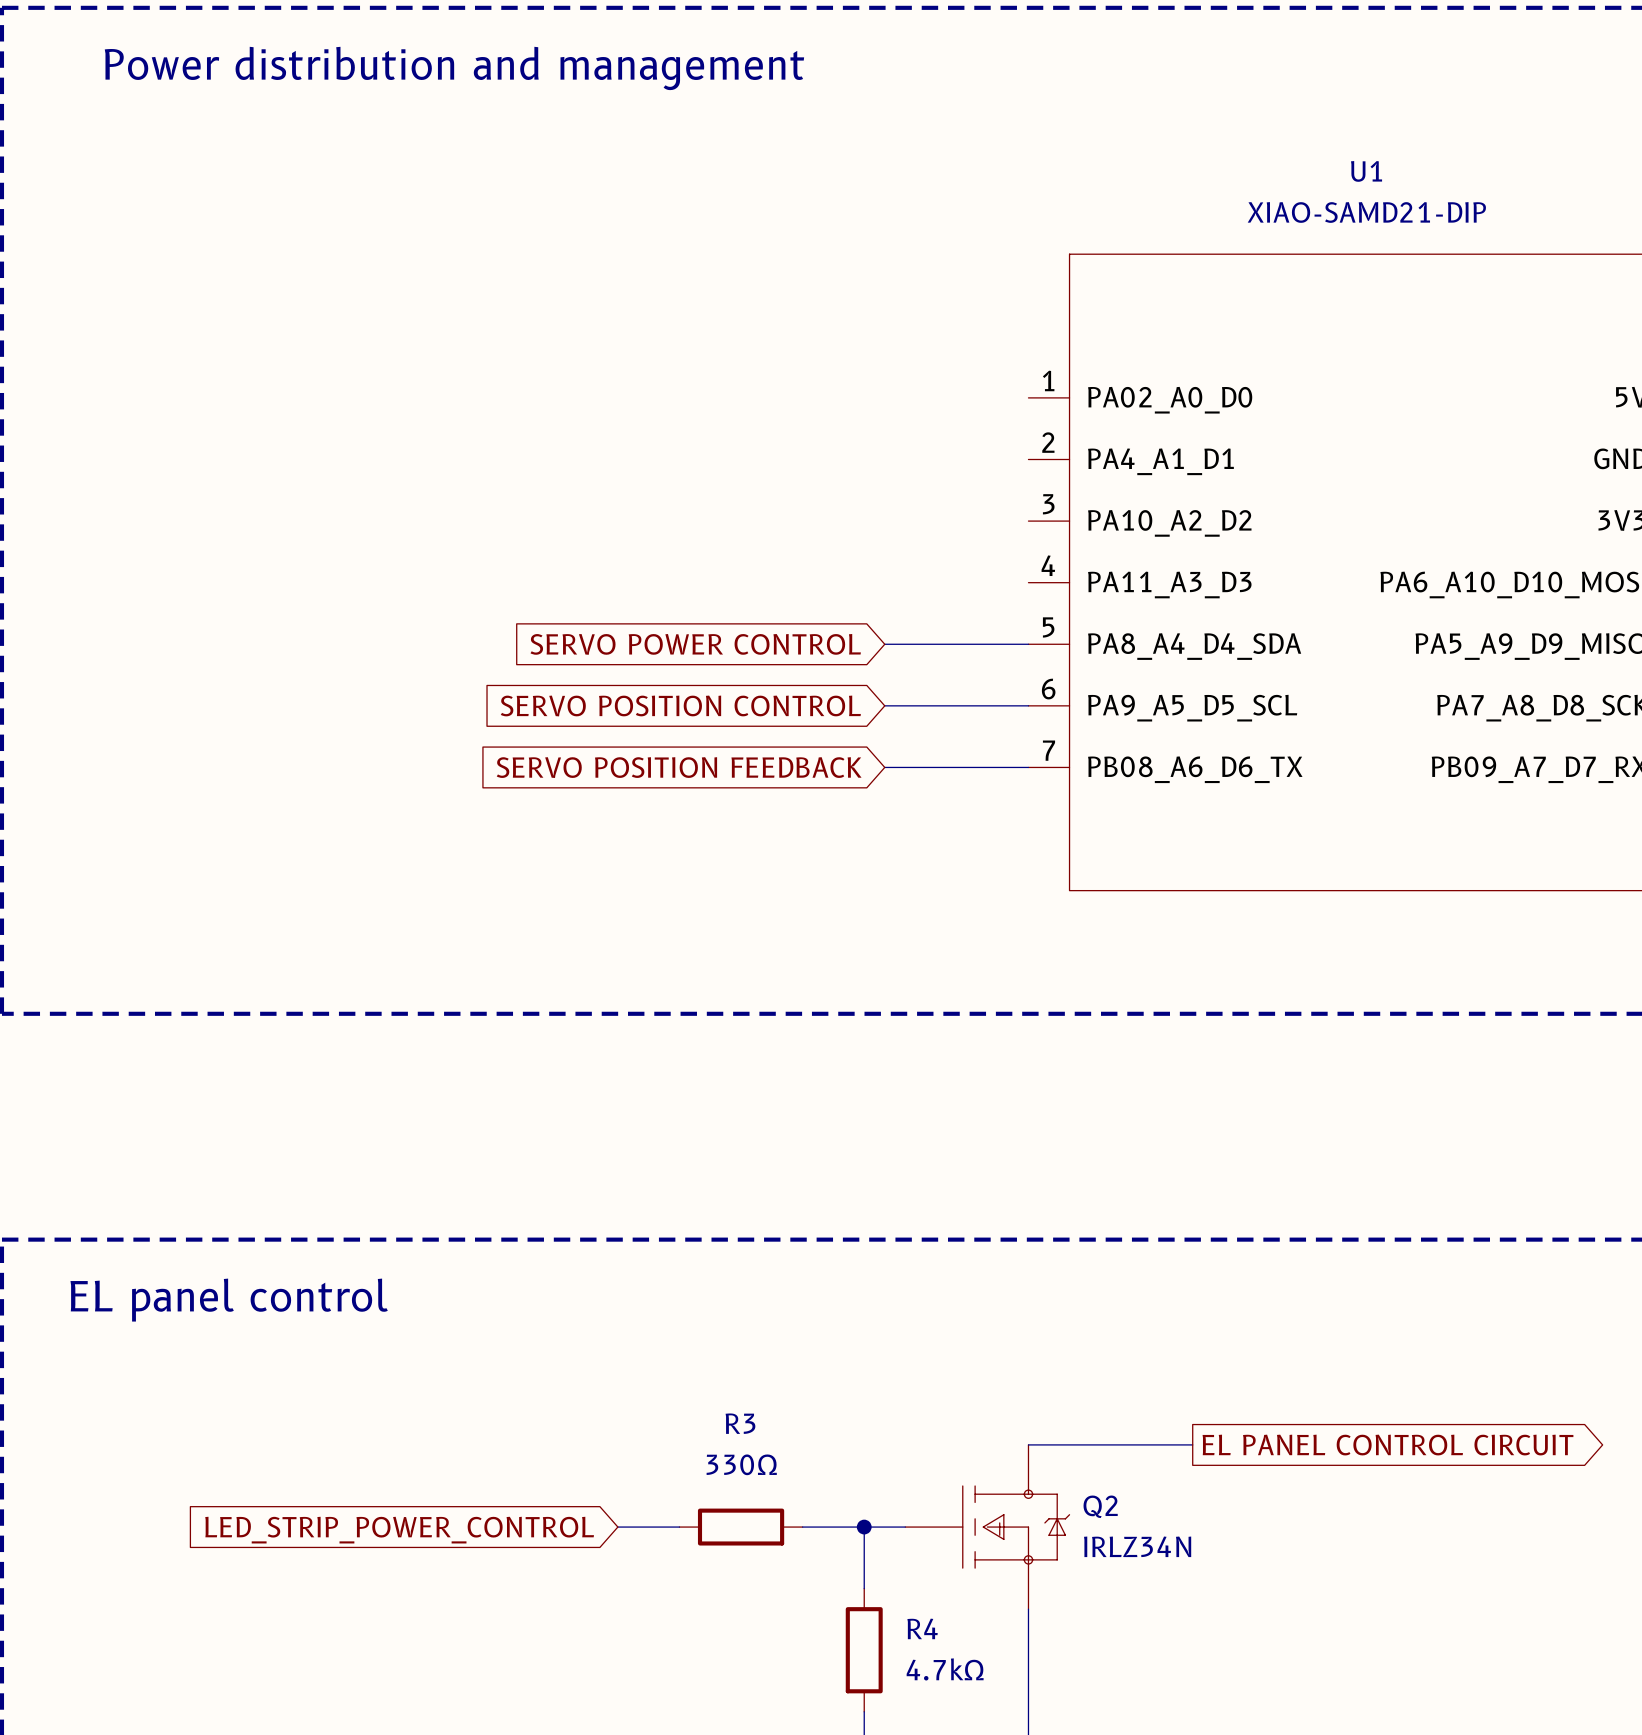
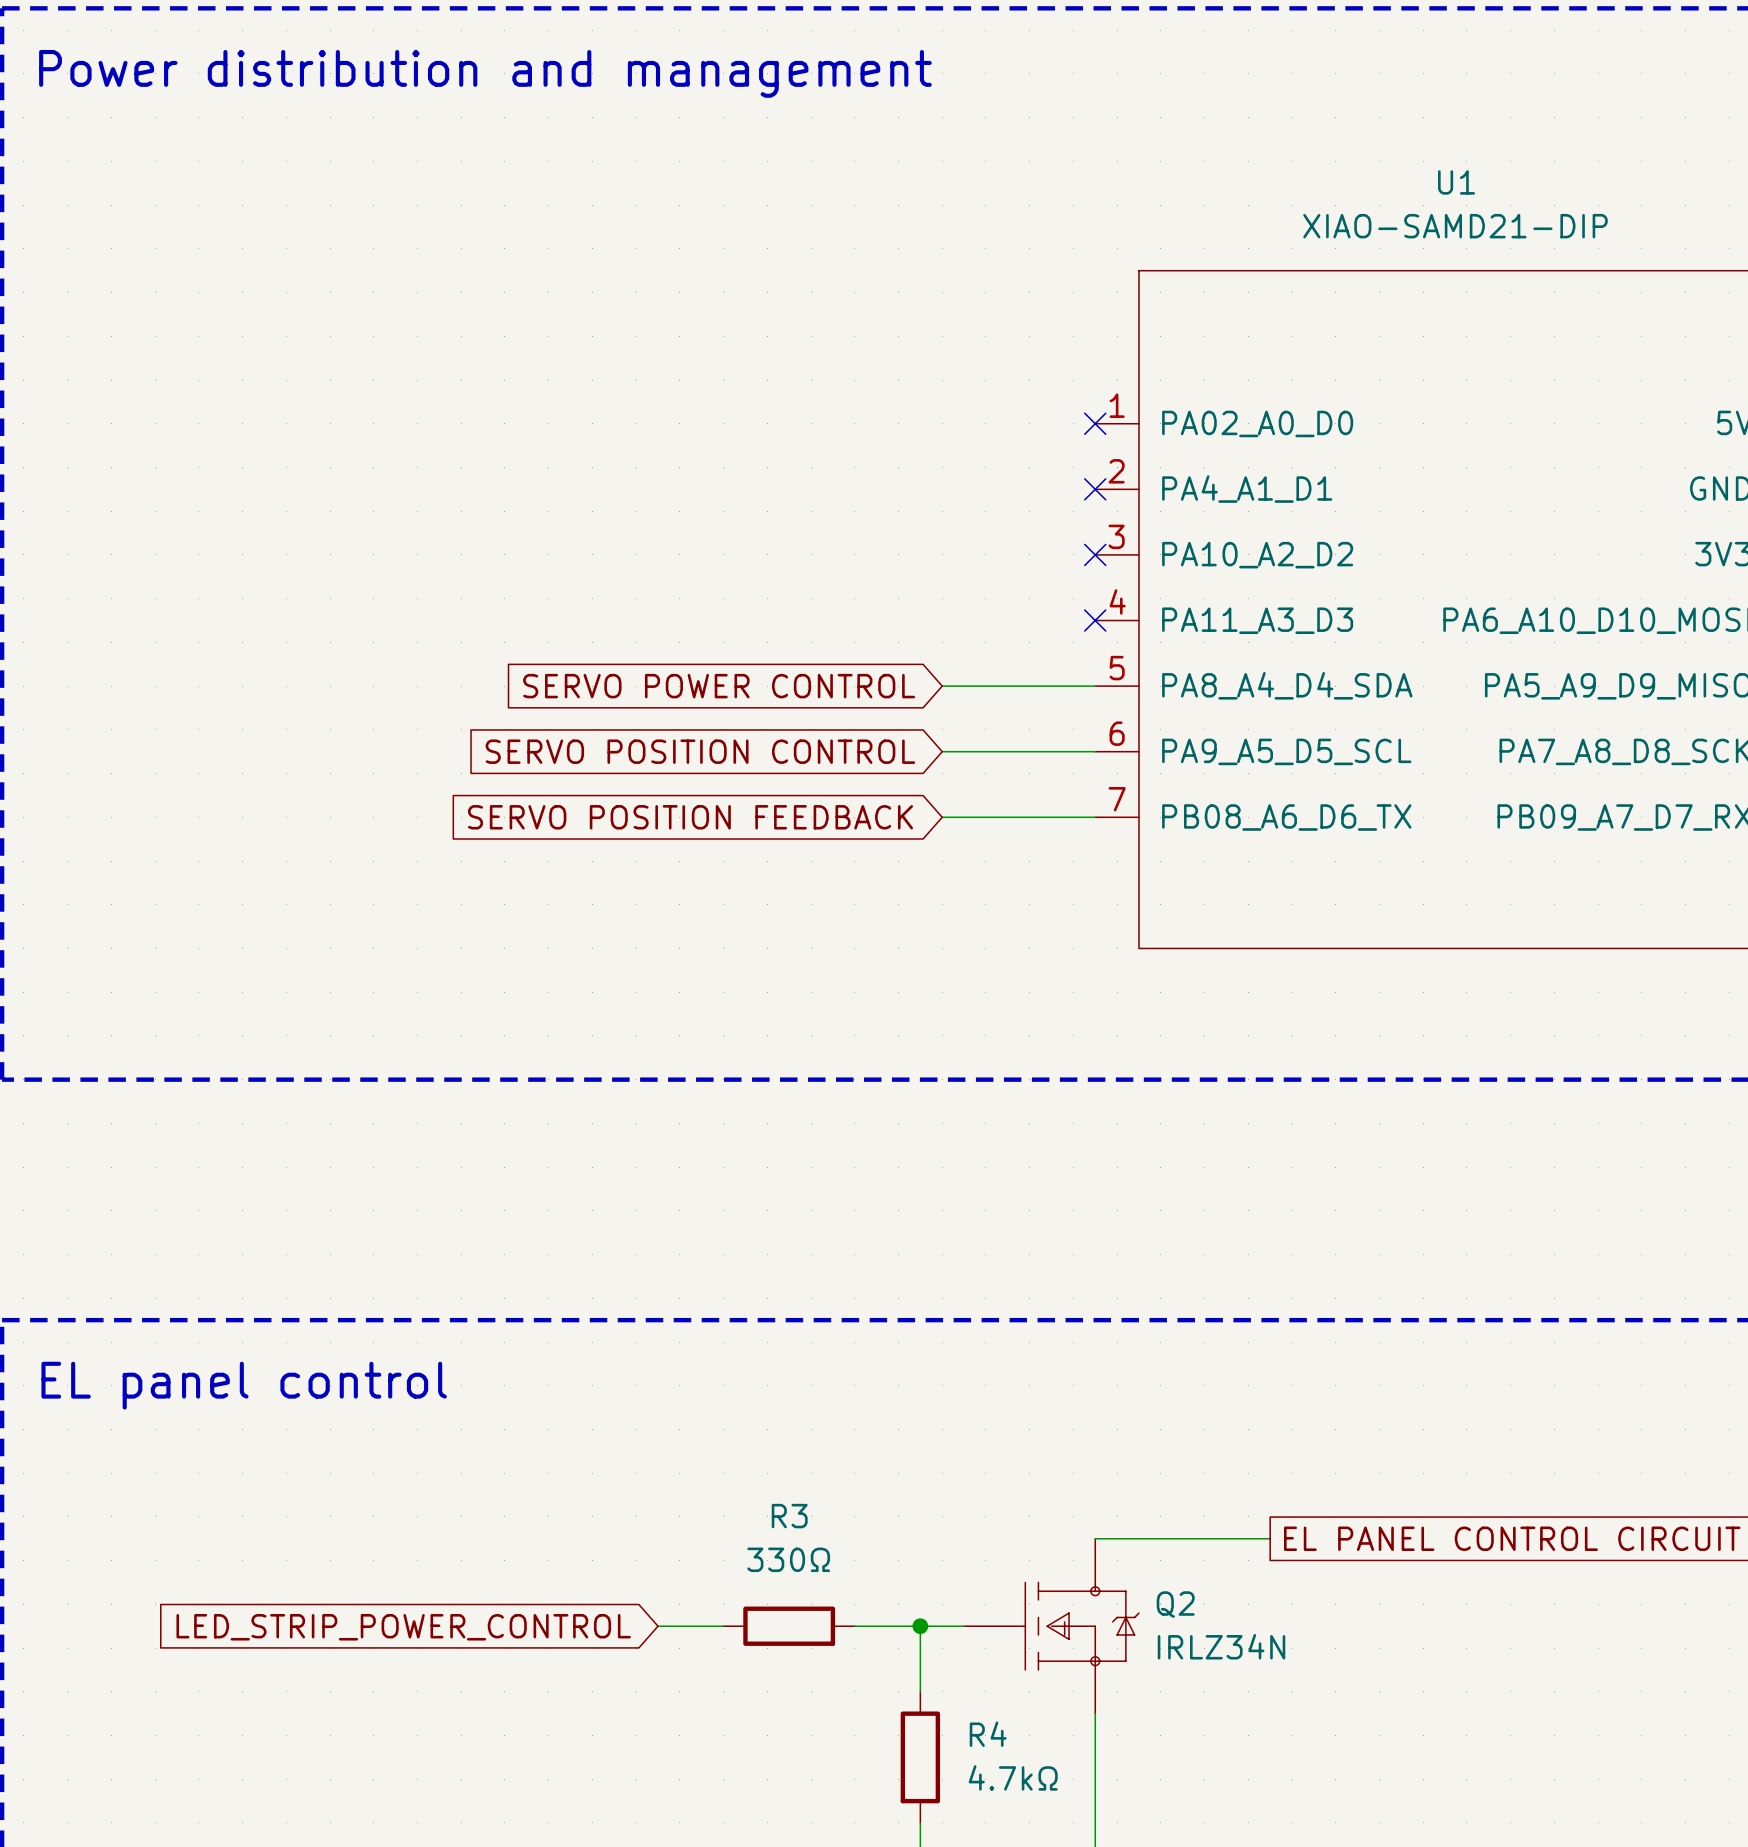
no-connect mark: none -> (1095, 423)
no-connect mark: none -> (1095, 489)
no-connect mark: none -> (1095, 554)
no-connect mark: none -> (1095, 620)

